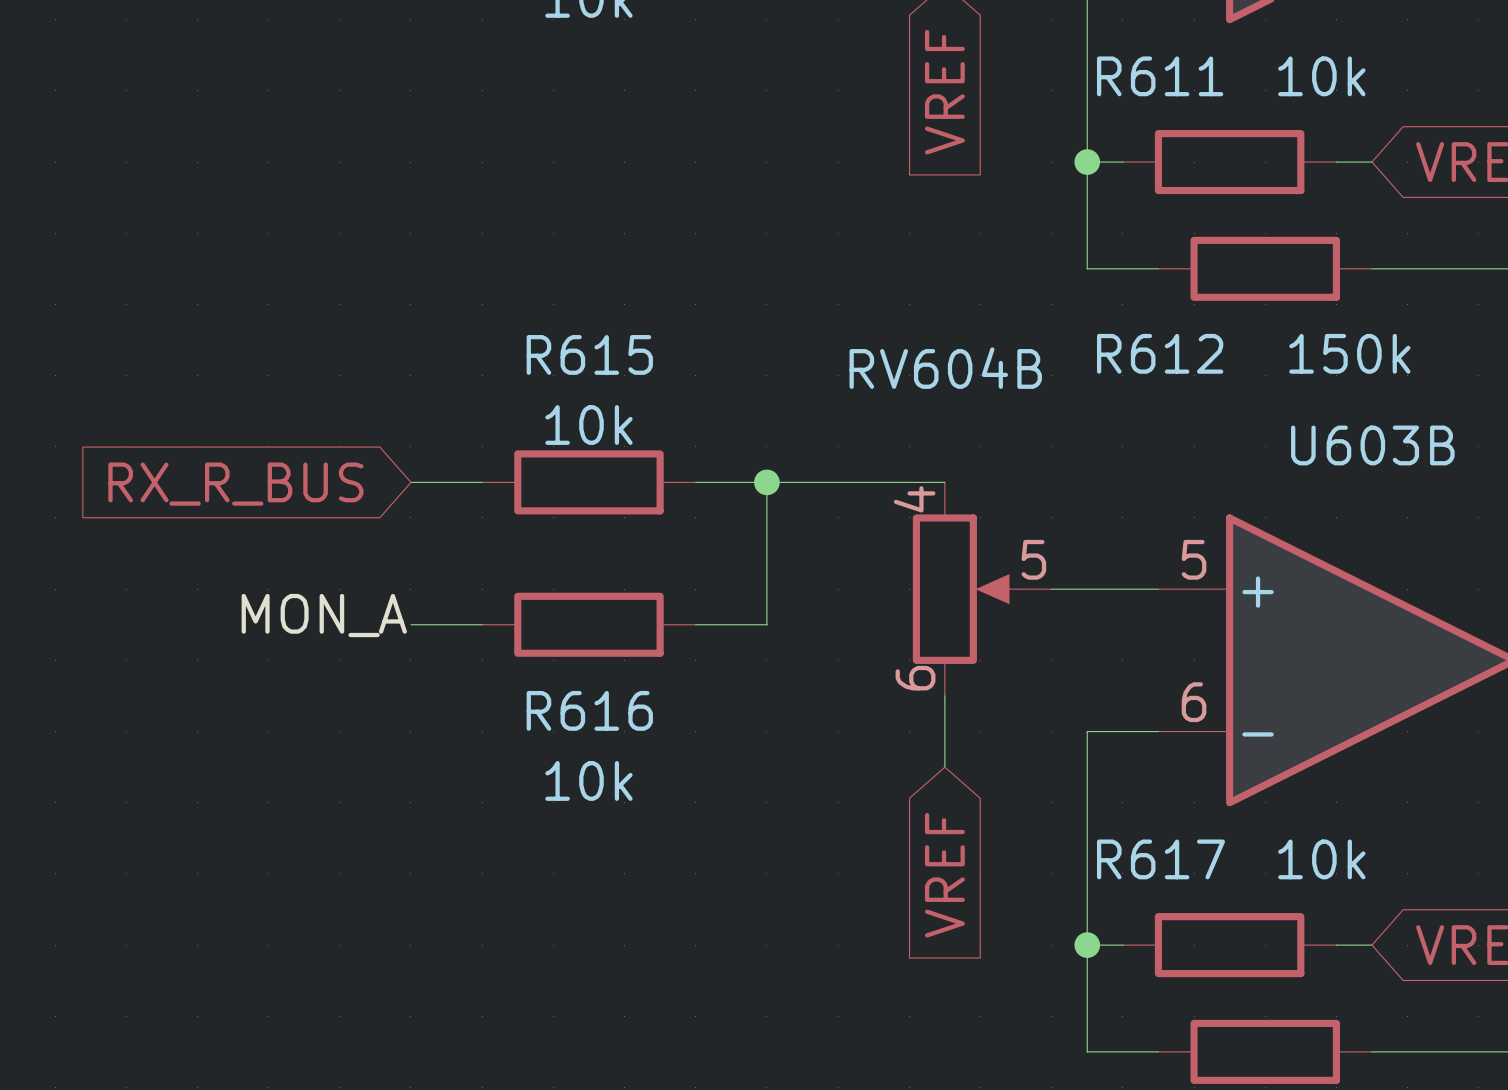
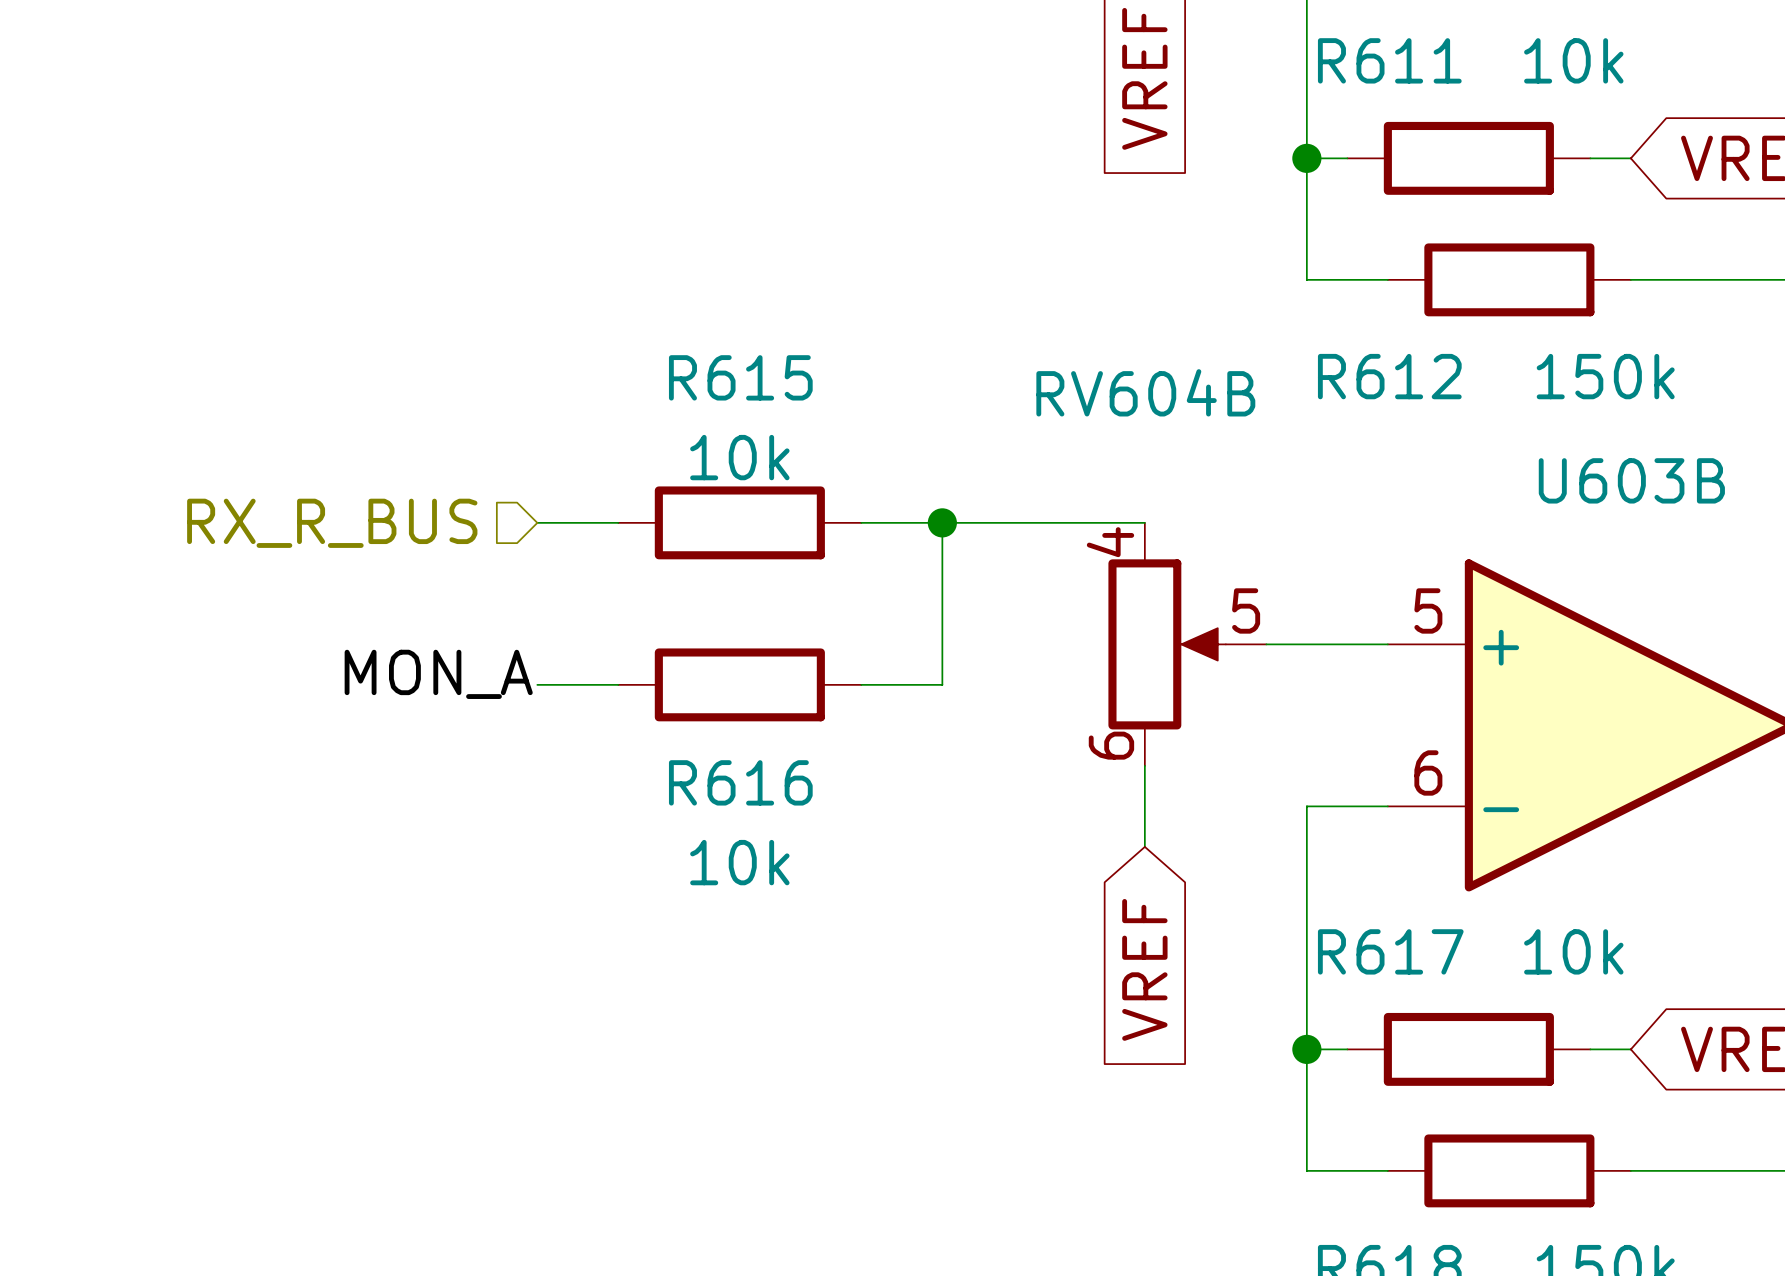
hierarchical label: none -> RX_R_BUS (332, 523)
global label: RX_R_BUS (235, 484) -> none

